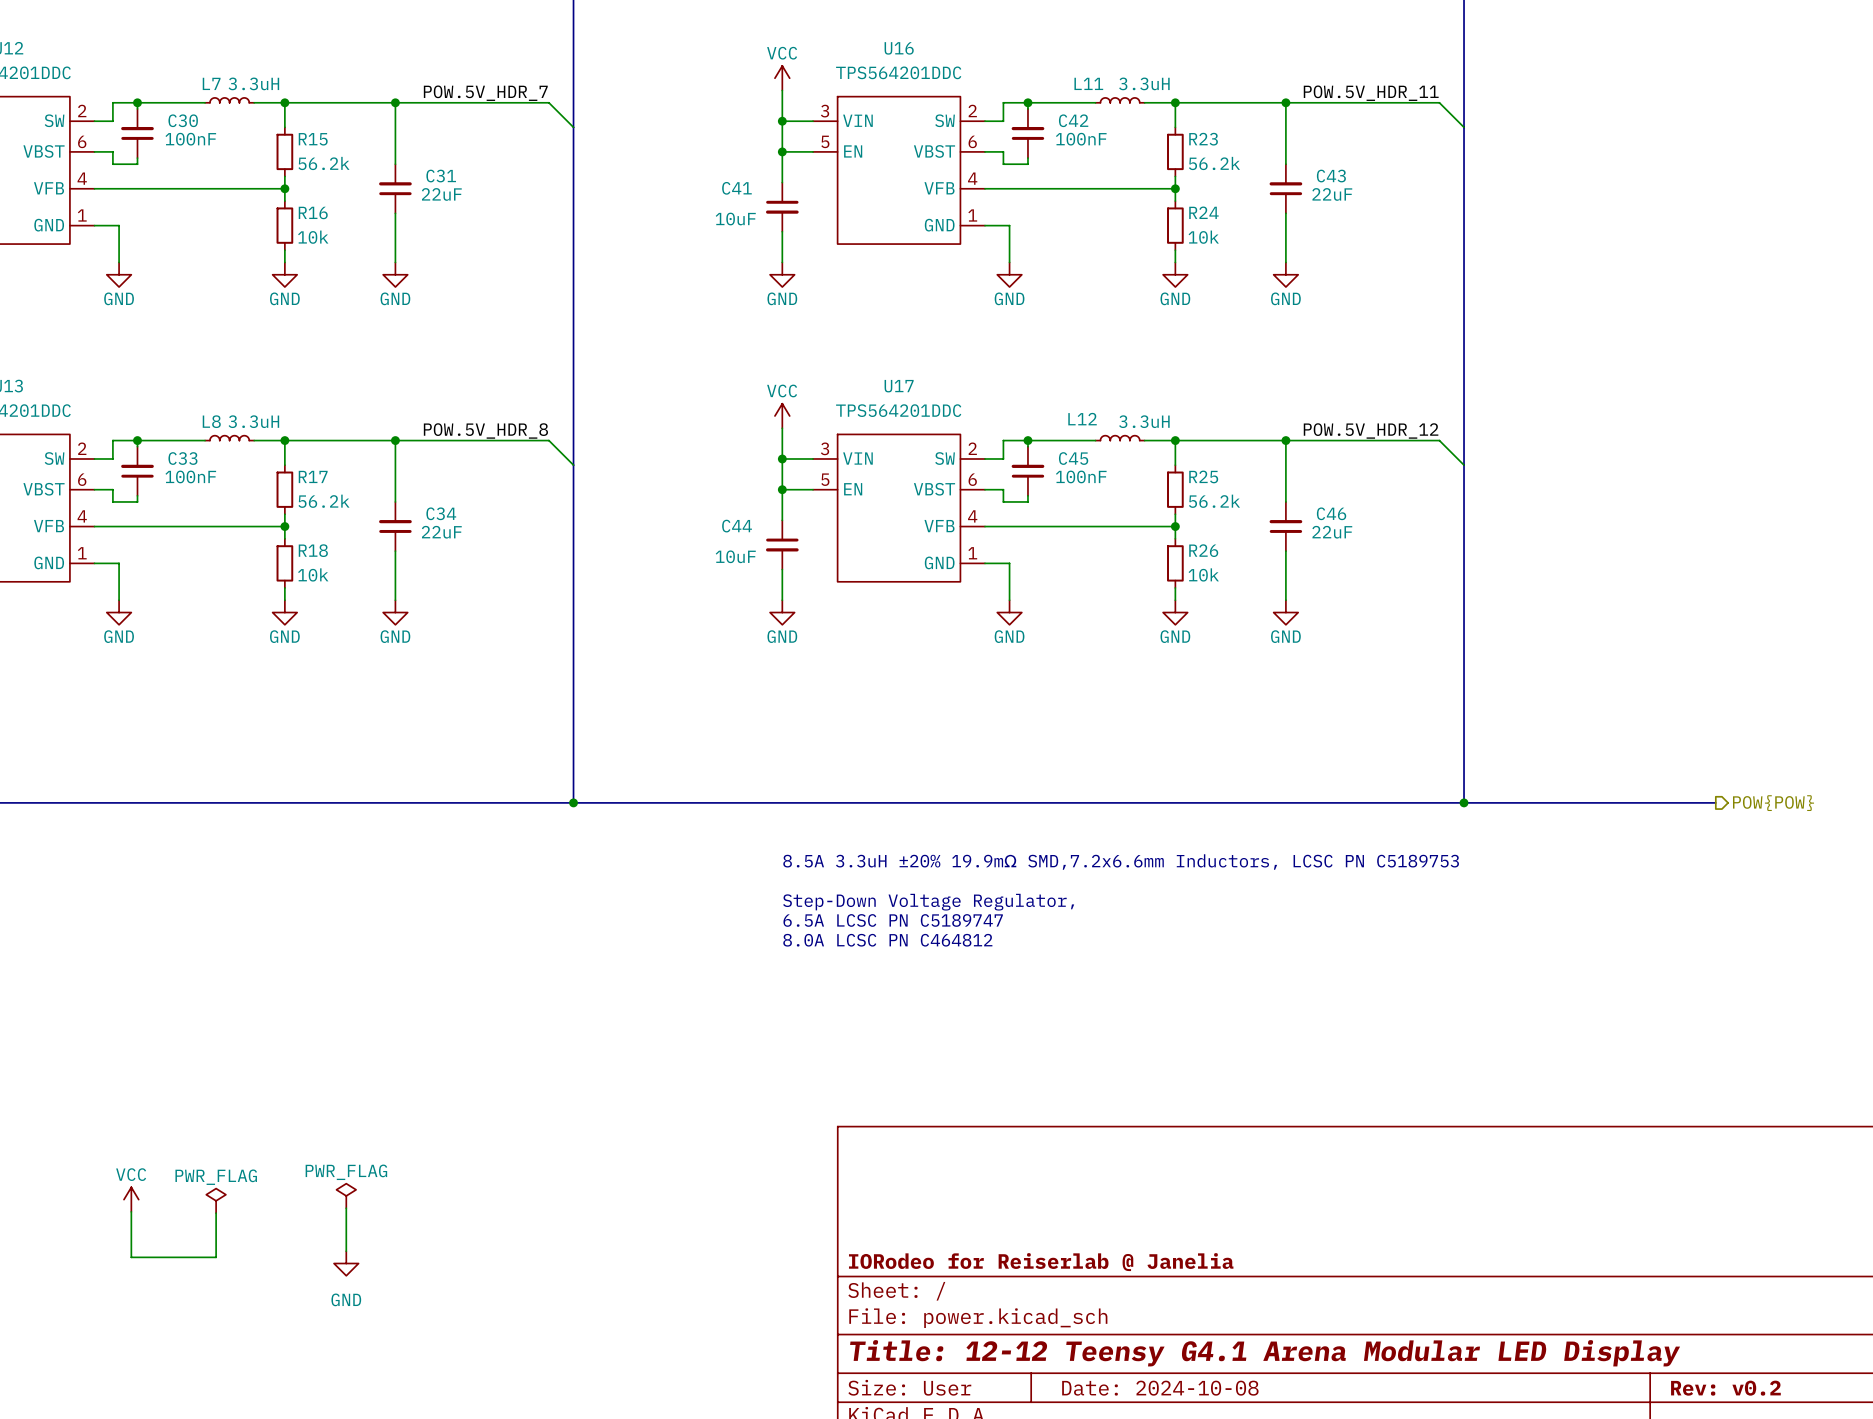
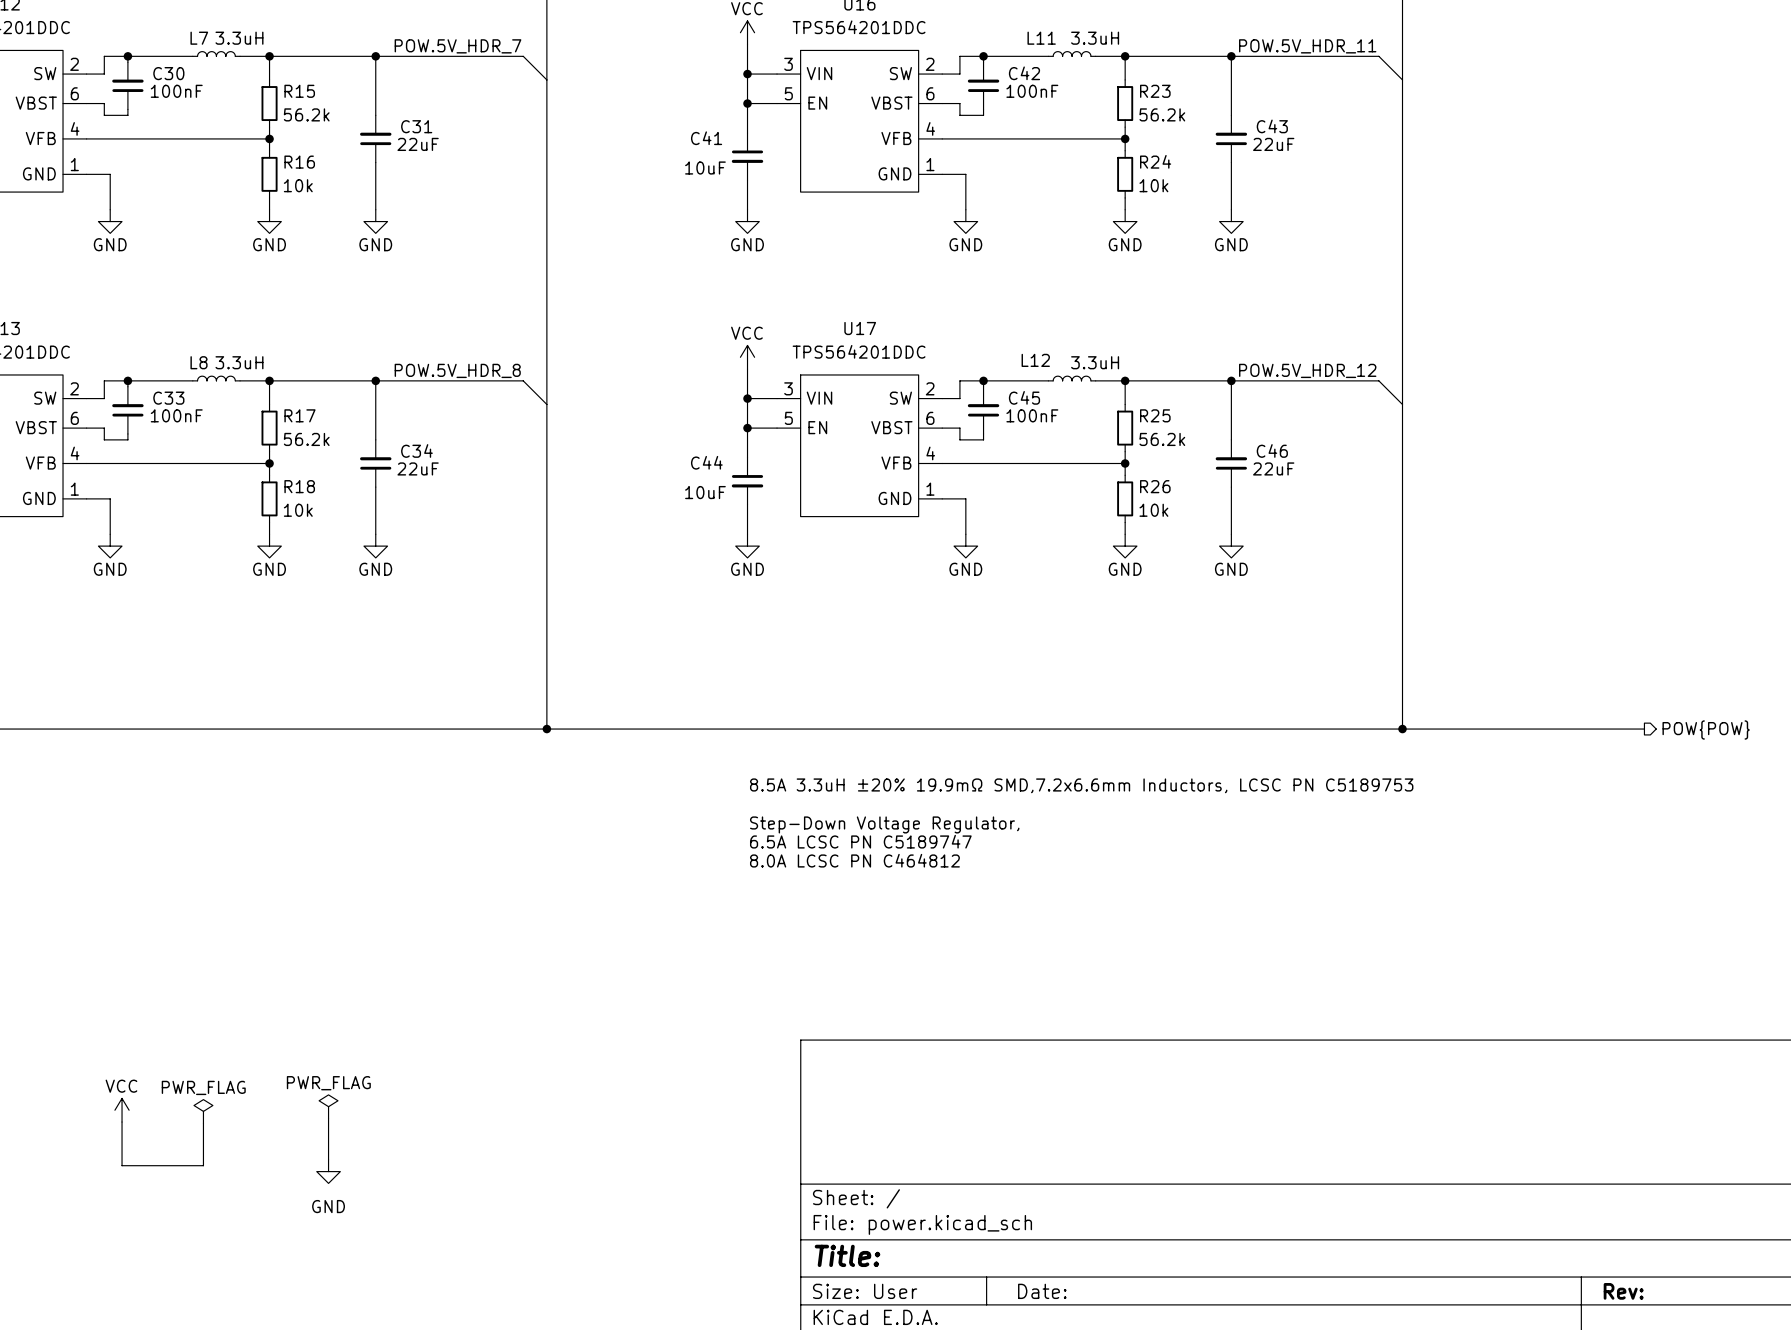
title block: IORodeo for Reiserlab @ Janelia (1041, 1262) -> none
title block: Title: 12-12 Teensy G4.1 Arena Modular LED Display (1265, 1353) -> Title: (847, 1255)
title block: Date: 2024-10-08 (1160, 1388) -> Date: (1042, 1291)
title block: Rev: v0.2 (1725, 1388) -> Rev: (1623, 1291)

